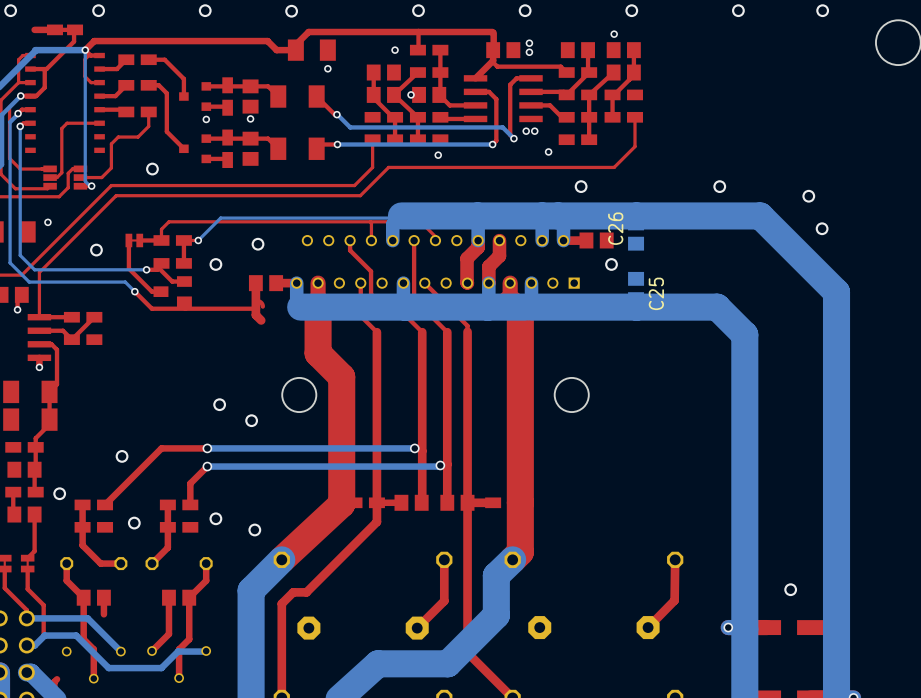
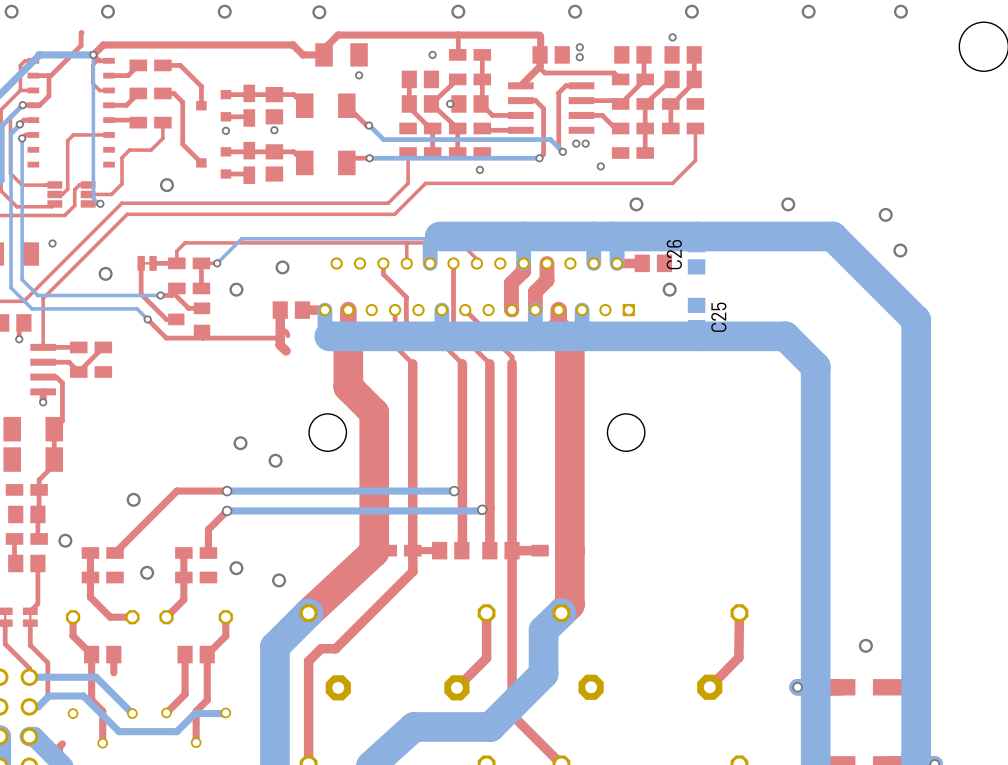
top track: (54, 29) (34, 29) -> none
part: (65, 29) -> none

